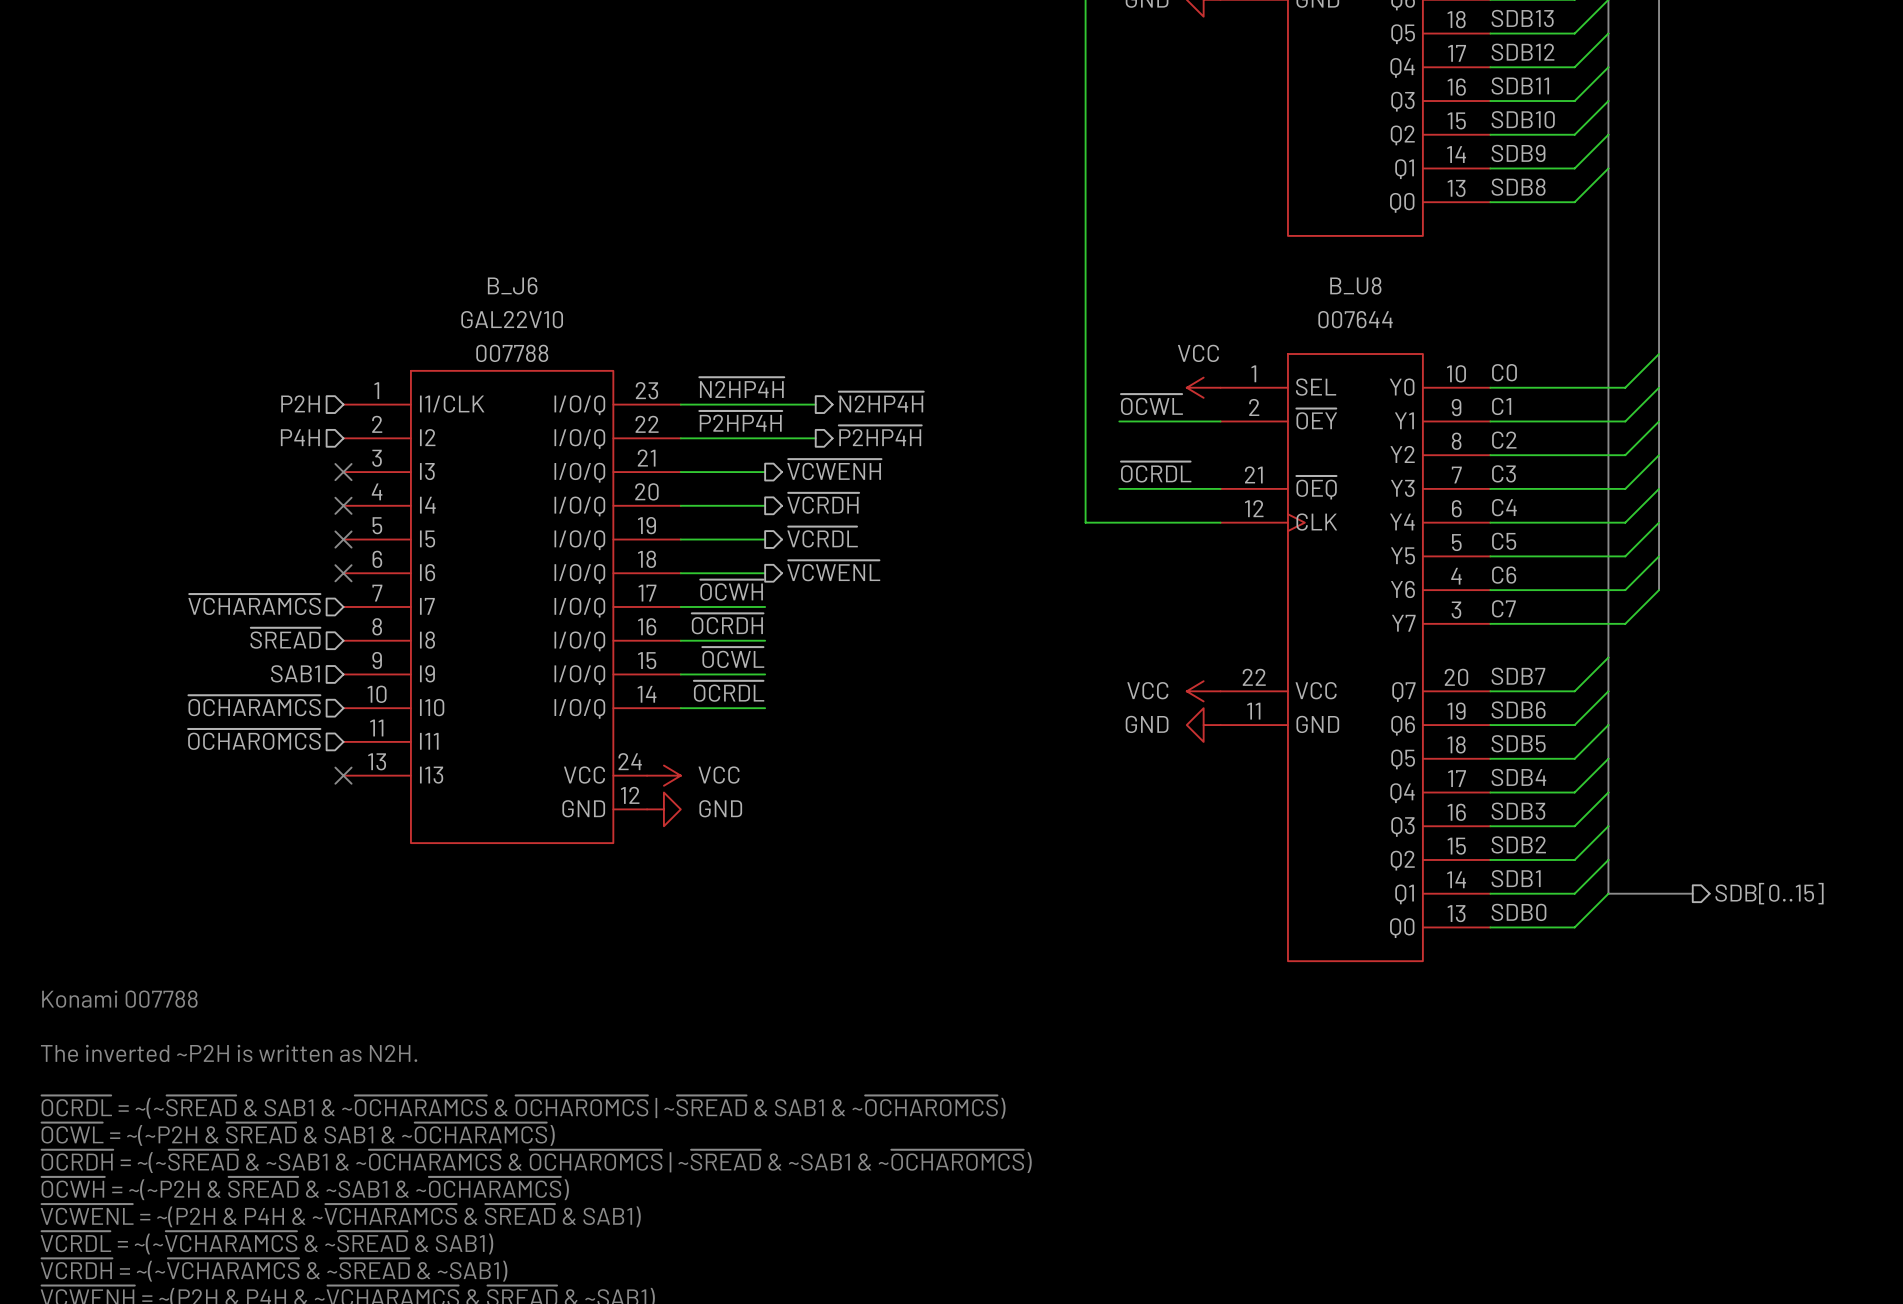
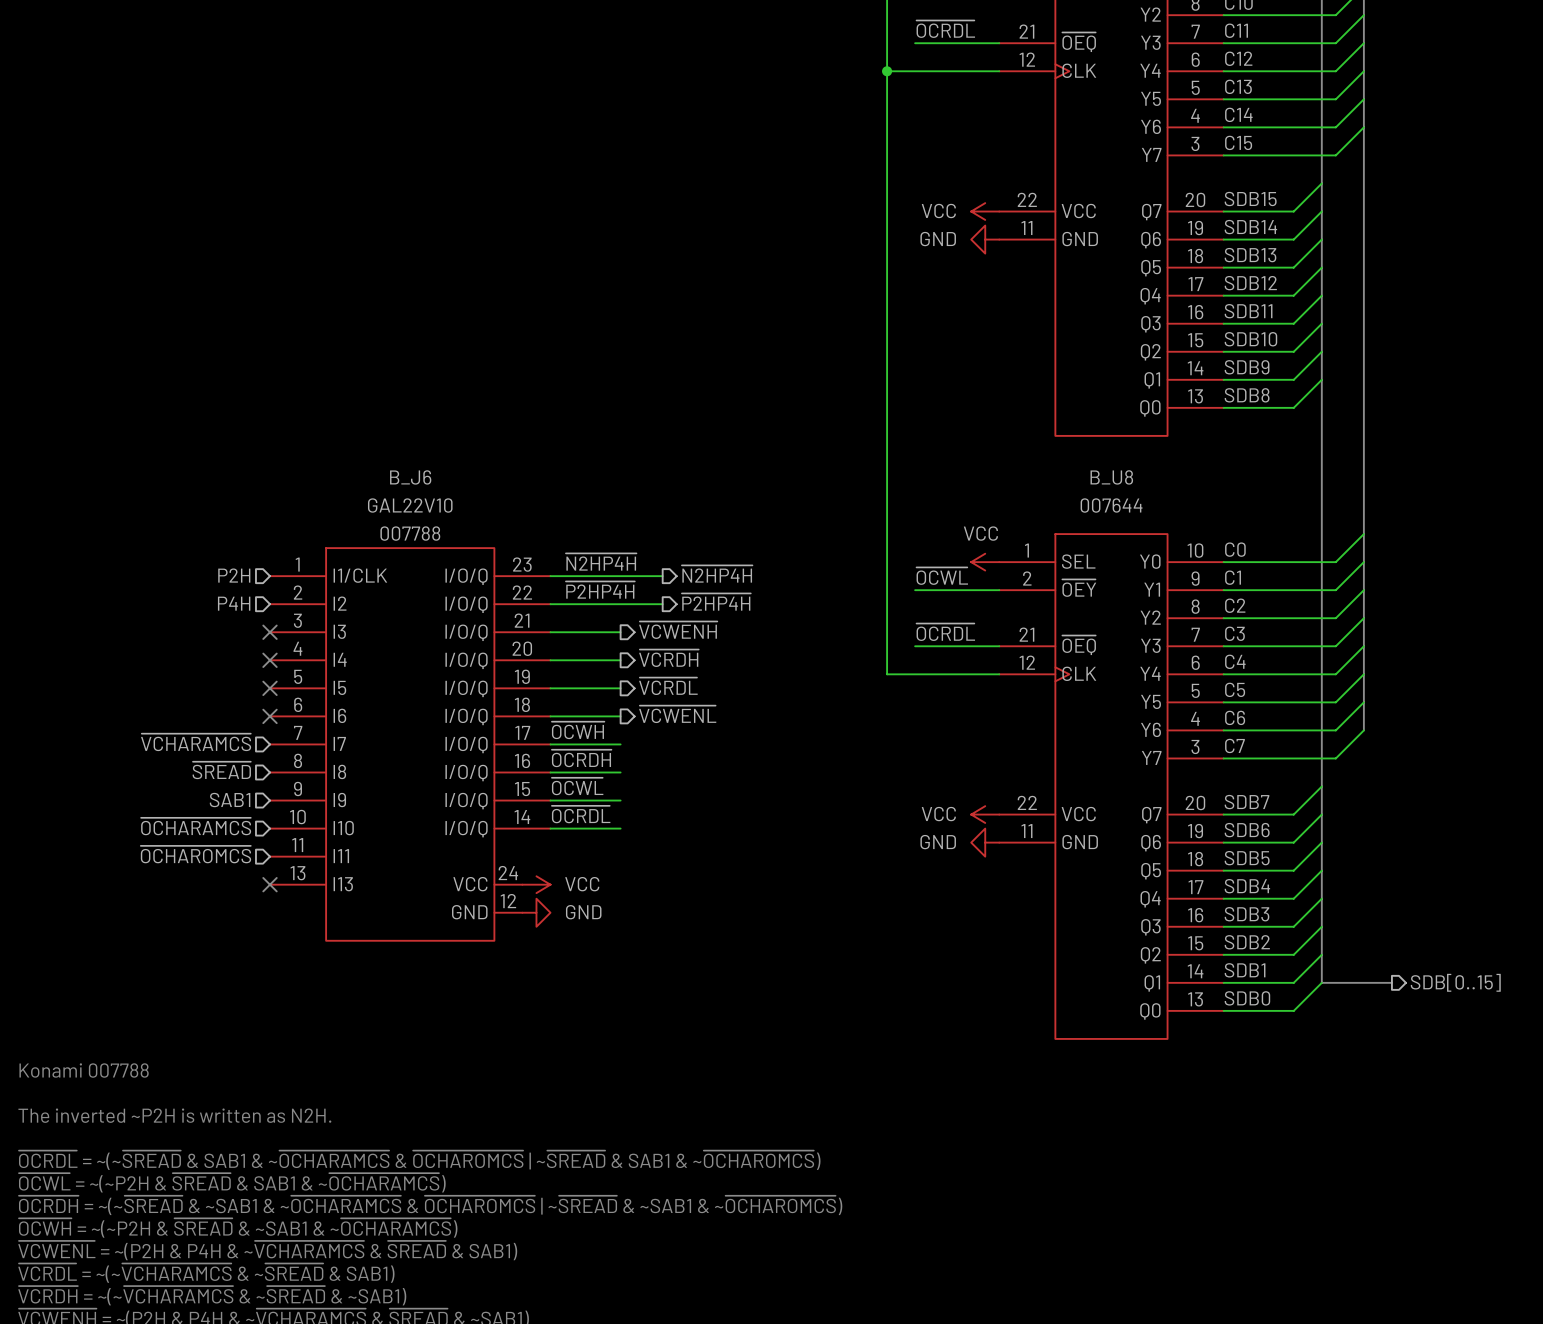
label position: ~{OCWH} (731, 590) -> ~{OCWH} (578, 730)
label position: ~{OCRDH} (727, 623) -> ~{OCRDH} (581, 758)
label position: ~{OCWL} (733, 657) -> ~{OCWL} (577, 786)
label position: ~{OCRDL} (729, 691) -> ~{OCRDL} (581, 814)

